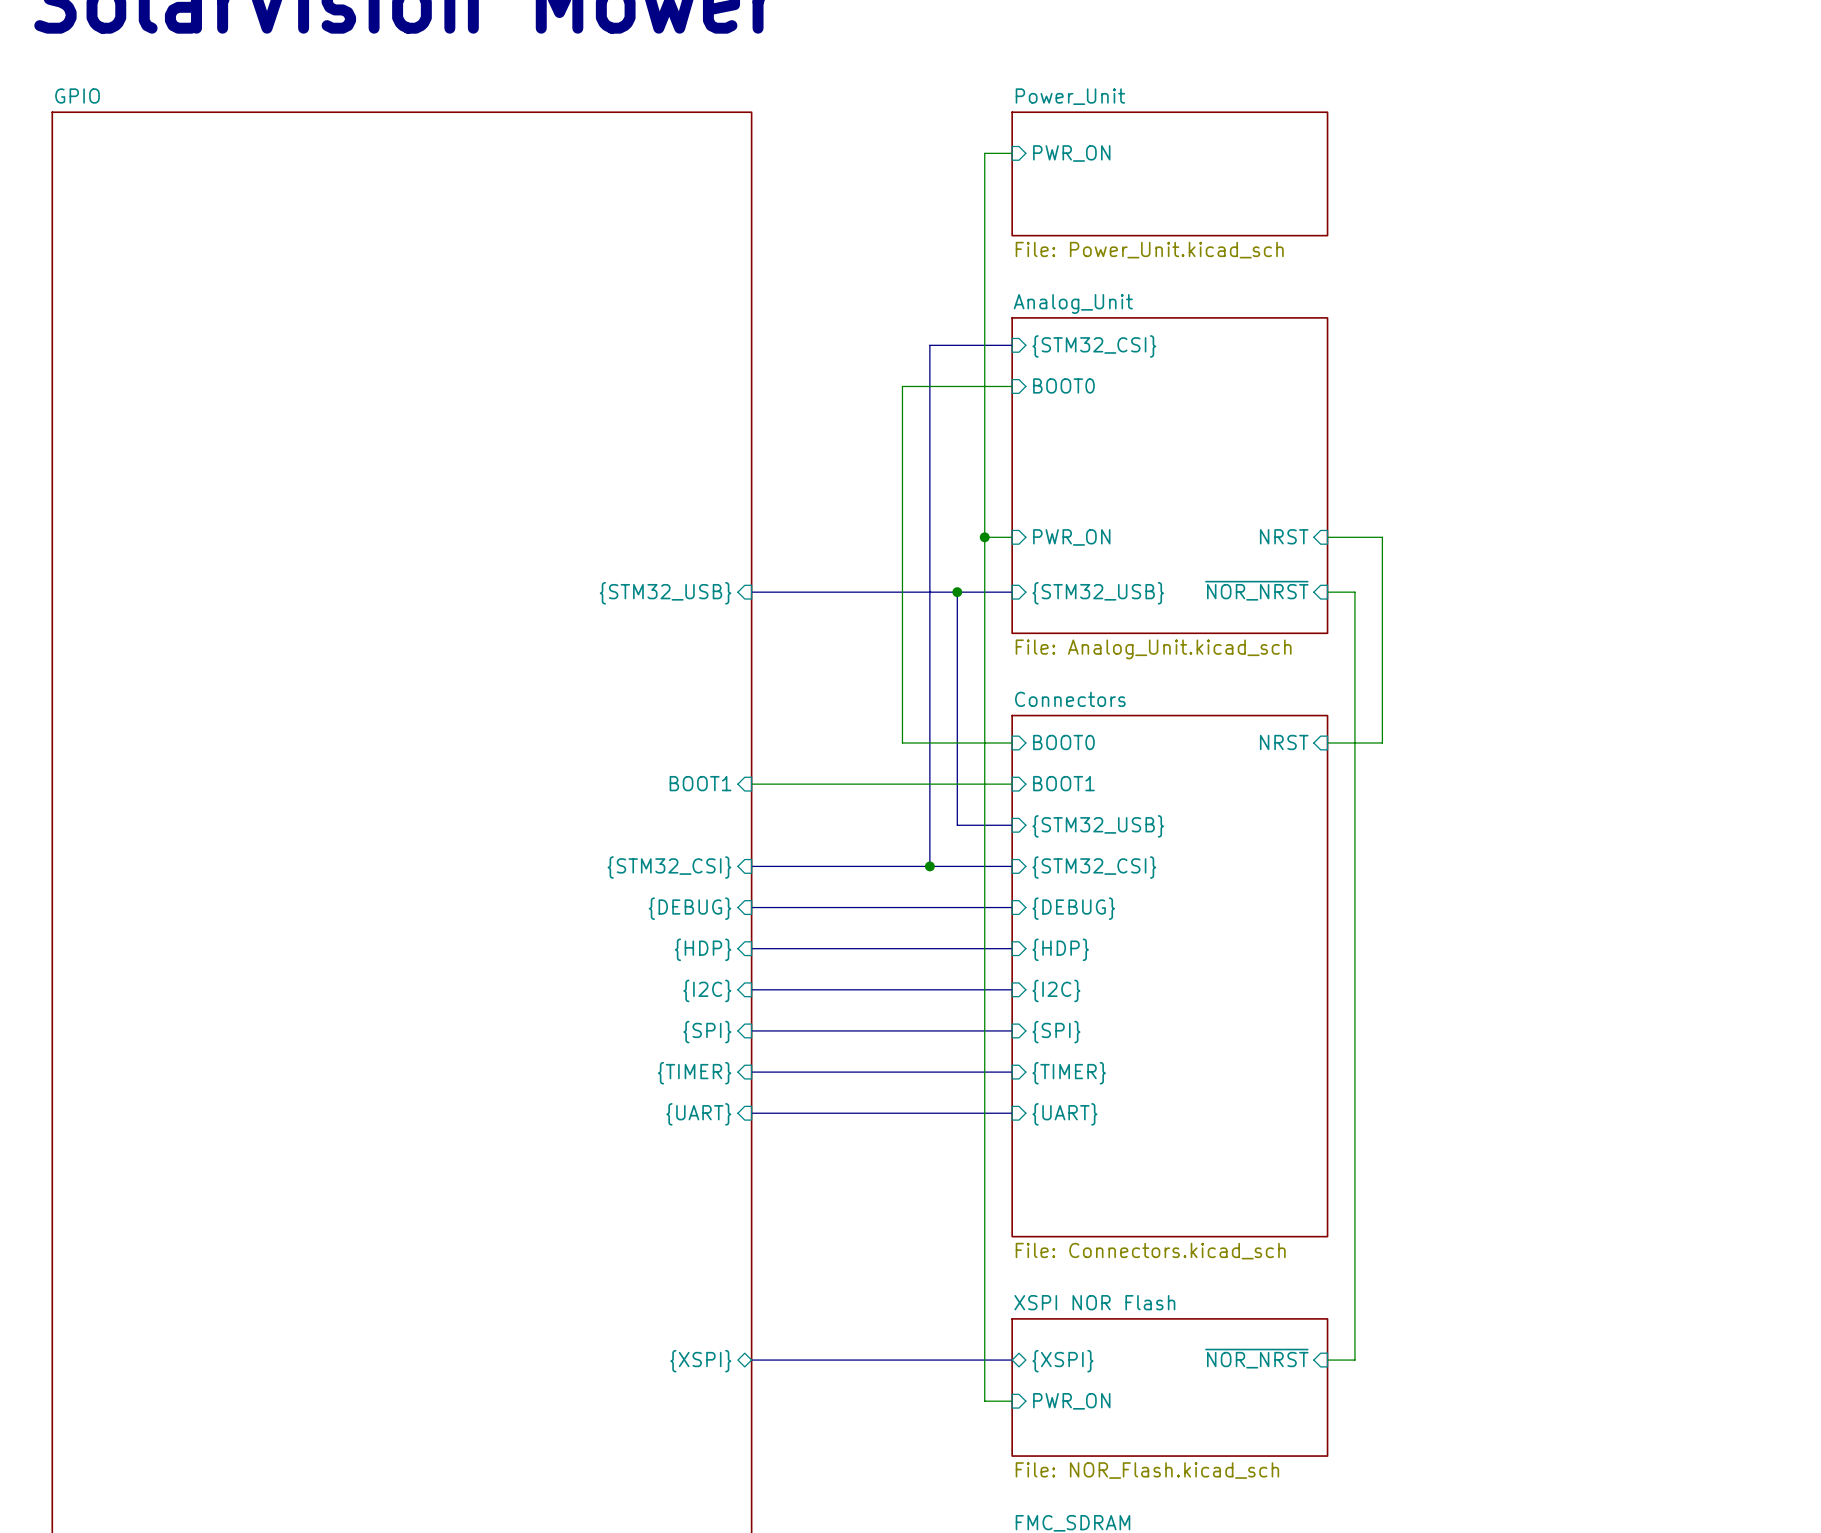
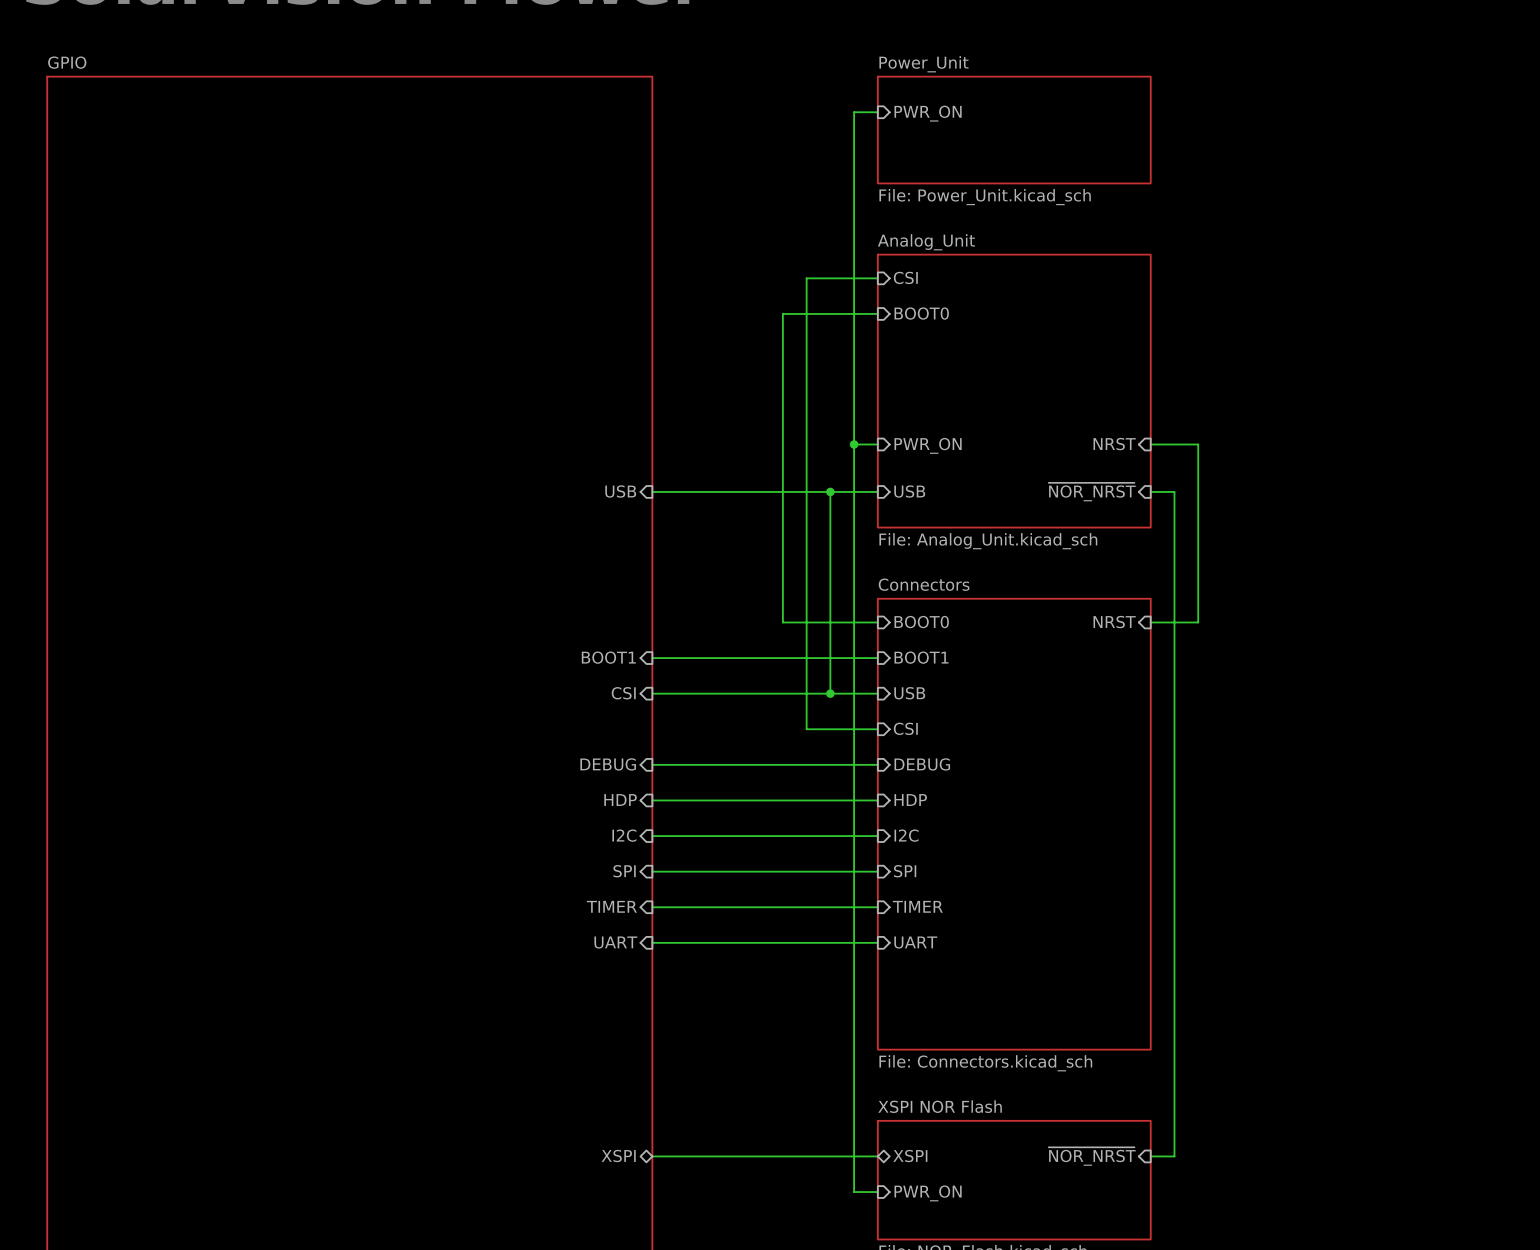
bus: (1012, 345) (929, 345) (929, 866) -> none
sheet pin: {STM32_CSI} (1094, 346) -> CSI (905, 277)
bus: (751, 592) (1012, 592) -> none
bus: (957, 592) (957, 825) (1012, 825) -> none
sheet pin: {STM32_USB} (665, 593) -> USB (620, 491)
sheet pin: {STM32_USB} (1098, 593) -> USB (909, 491)
sheet pin: none -> CSI (623, 693)
wire: none -> (652, 693) (877, 693)
sheet pin: {STM32_USB} (1098, 826) -> USB (909, 693)
bus: (751, 866) (1012, 866) -> none
junction position: (929, 866) -> (830, 693)
sheet pin: {STM32_CSI} (669, 867) -> none
sheet pin: {STM32_CSI} (1094, 867) -> CSI (905, 728)
bus: (751, 907) (1012, 907) -> none
sheet pin: {DEBUG} (690, 908) -> DEBUG (608, 764)
sheet pin: {DEBUG} (1073, 908) -> DEBUG (922, 764)
bus: (751, 948) (1012, 948) -> none
sheet pin: {HDP} (703, 949) -> HDP (620, 800)
sheet pin: {HDP} (1060, 949) -> HDP (910, 800)
bus: (751, 989) (1012, 989) -> none
sheet pin: {I2C} (707, 990) -> I2C (624, 835)
sheet pin: {I2C} (1056, 990) -> I2C (906, 835)
bus: (751, 1030) (1012, 1030) -> none
sheet pin: {SPI} (707, 1032) -> SPI (624, 871)
sheet pin: {SPI} (1056, 1032) -> SPI (905, 871)
bus: (751, 1072) (1012, 1072) -> none
sheet pin: {TIMER} (694, 1073) -> TIMER (611, 906)
sheet pin: {TIMER} (1069, 1073) -> TIMER (917, 906)
bus: (751, 1113) (1012, 1113) -> none
sheet pin: {UART} (698, 1114) -> UART (615, 942)
sheet pin: {UART} (1064, 1114) -> UART (915, 942)
bus: (751, 1360) (1012, 1360) -> none
sheet pin: {XSPI} (700, 1361) -> XSPI (618, 1156)
sheet pin: {XSPI} (1062, 1361) -> XSPI (910, 1156)

